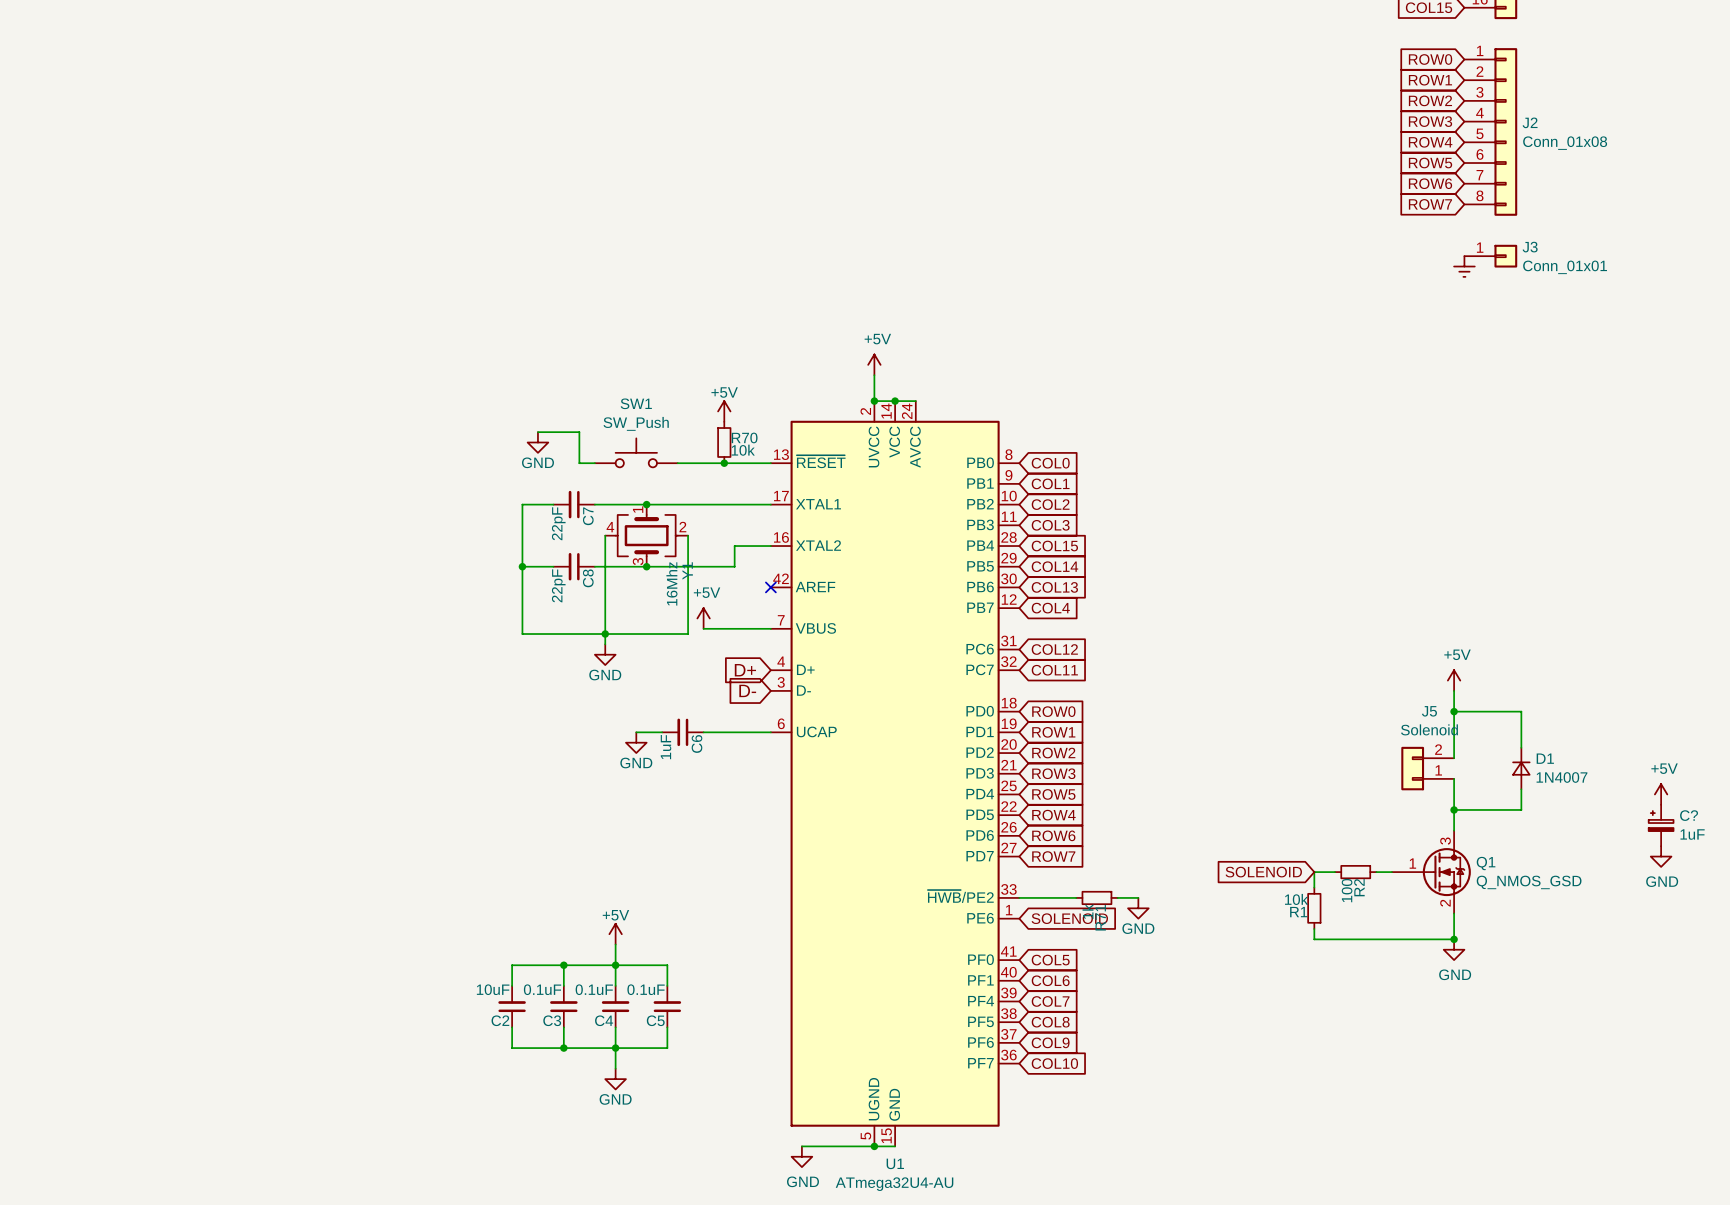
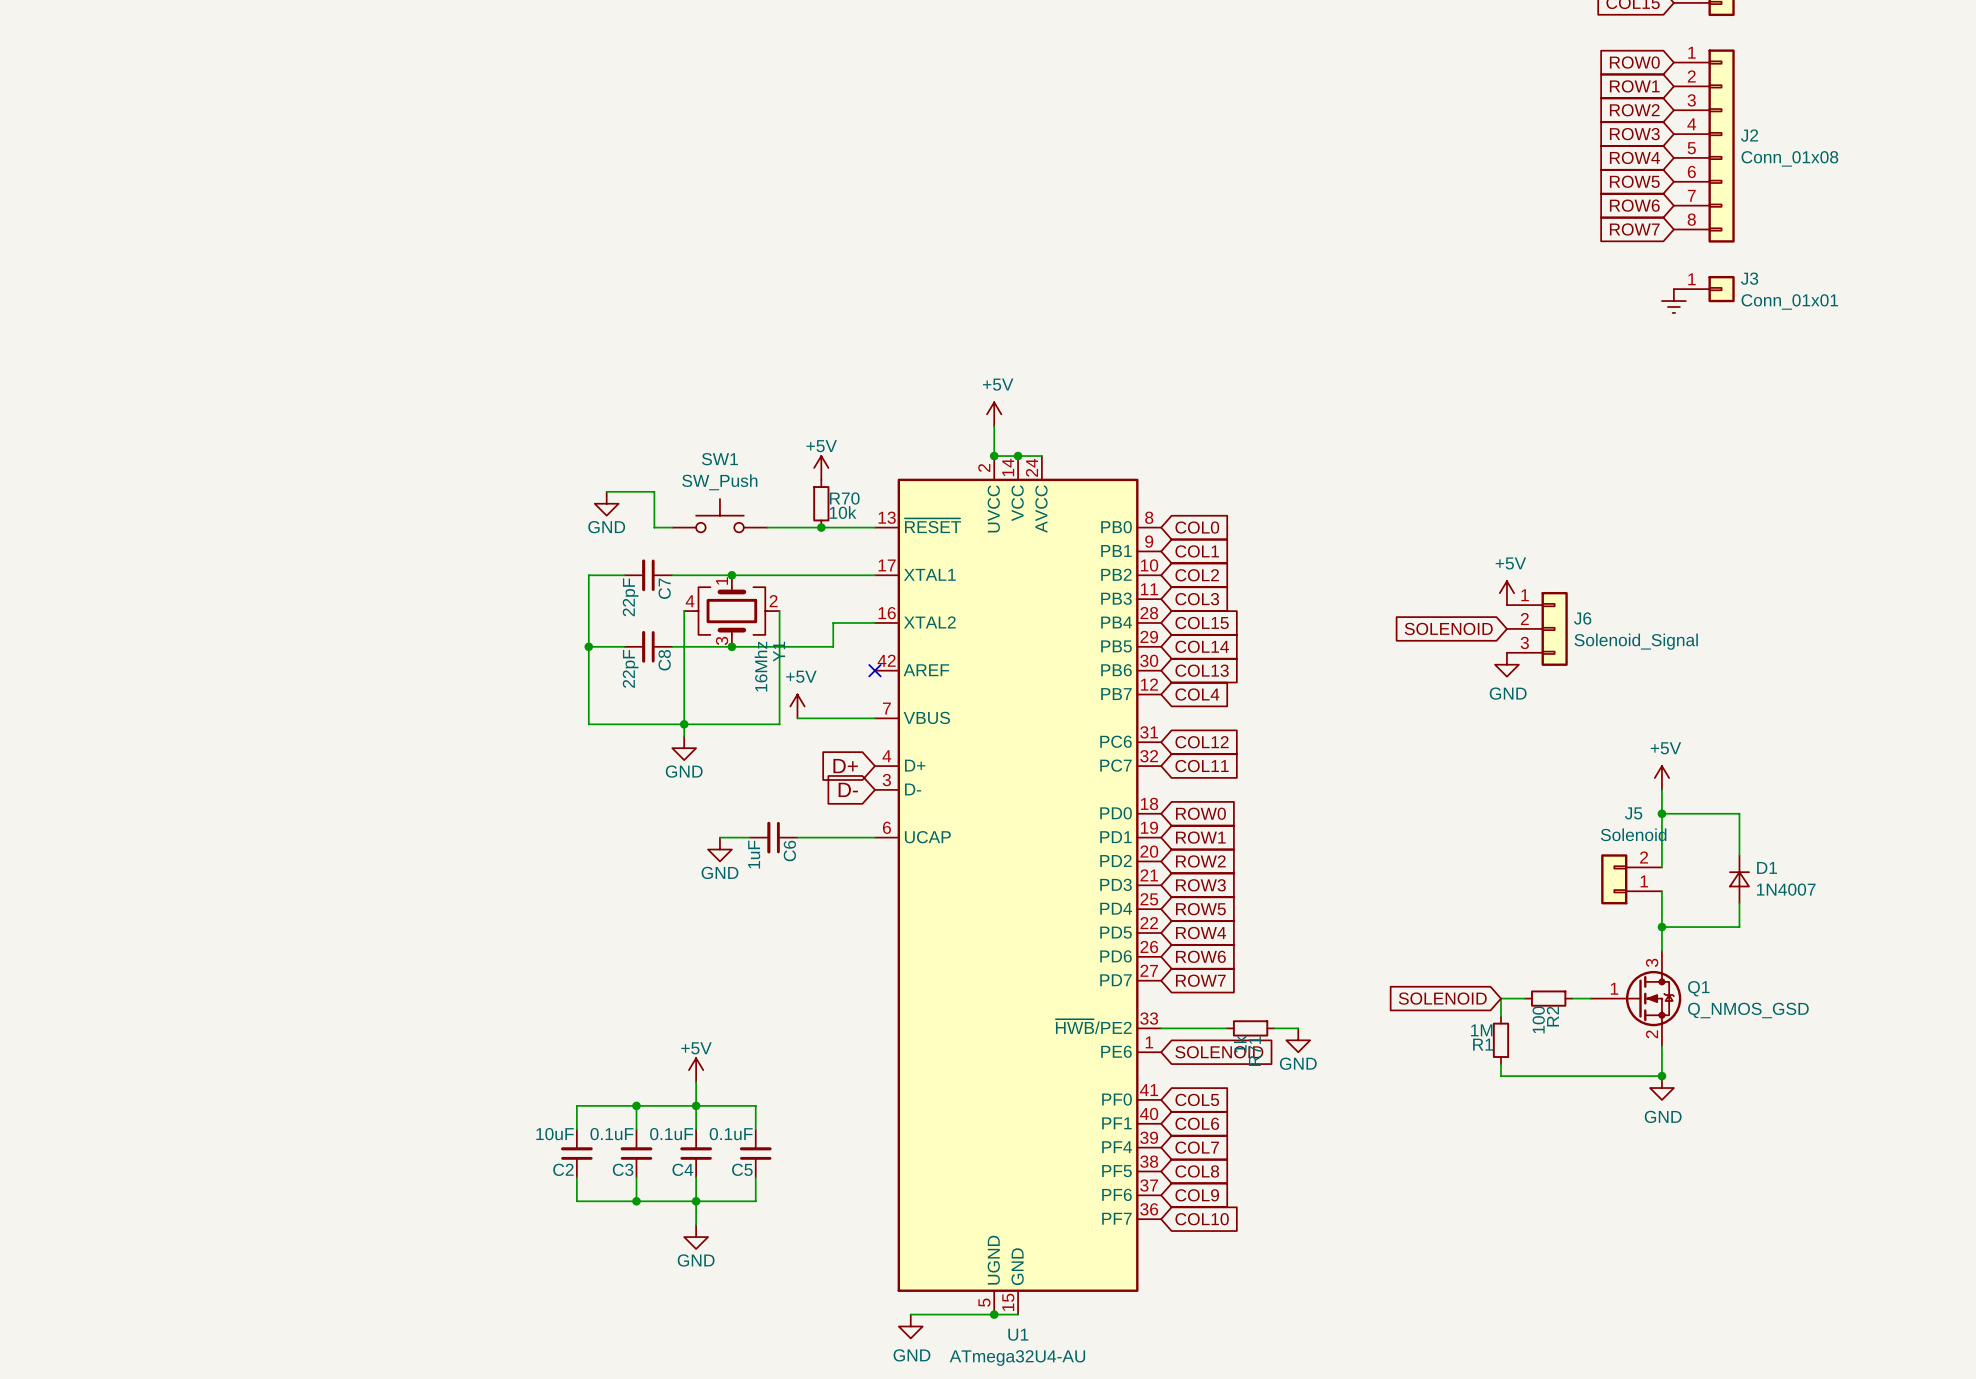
power symbol: none -> +5V (1506, 593)
global label: none -> SOLENOID (1448, 628)
J6: none -> Solenoid_Signal (1537, 628)
power symbol: none -> GND (1506, 664)
power symbol: +5V (1661, 794) -> none
C?: 1uF (1661, 825) -> none
power symbol: GND (1661, 856) -> none
R1 value: 10k (1296, 899) -> 1M (1481, 1030)

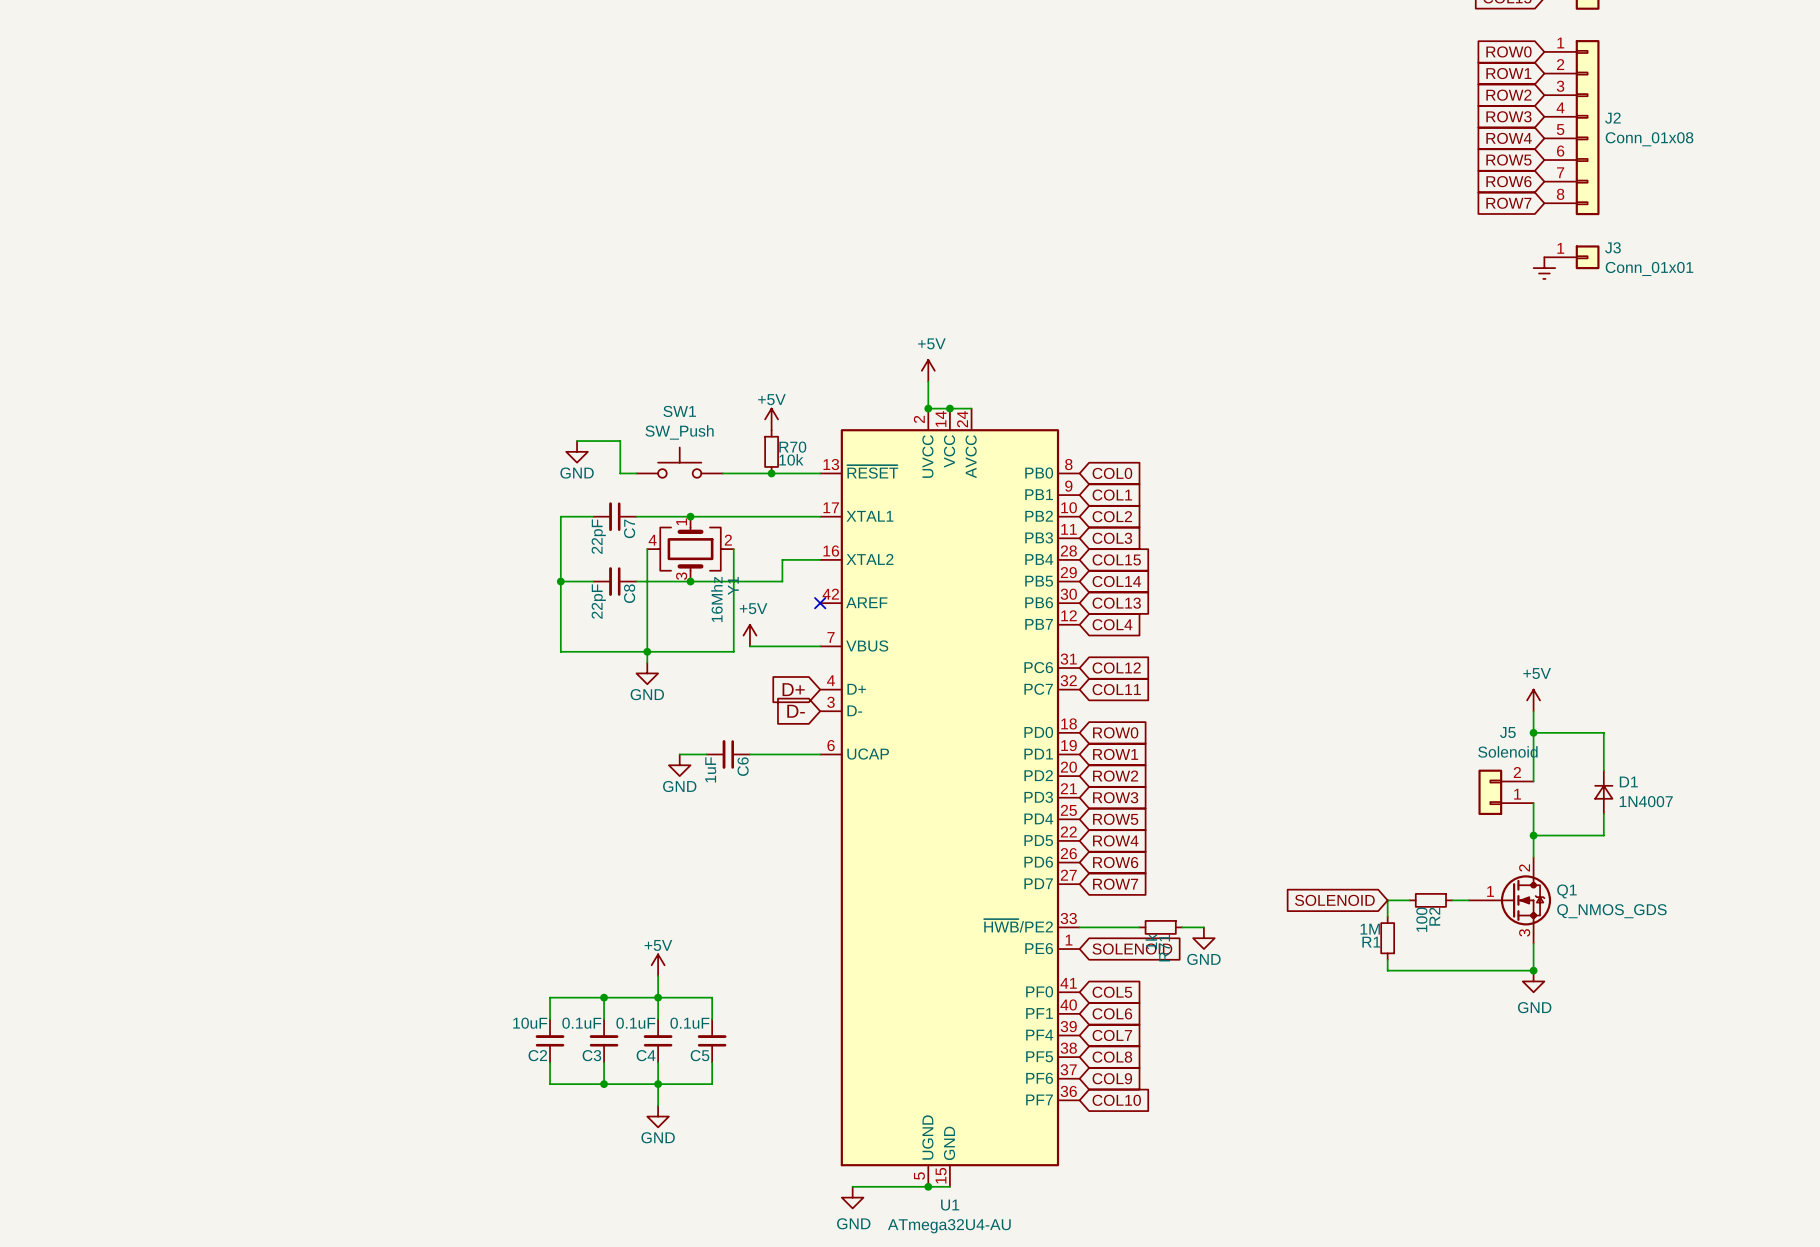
power symbol: +5V (1506, 593) -> none
global label: SOLENOID (1448, 628) -> none
J6: Solenoid_Signal (1537, 628) -> none
power symbol: GND (1506, 664) -> none
Q1 pin number: 3 (1652, 962) -> 2 (1524, 867)
Q1 value: Q_NMOS_GSD (1748, 1010) -> Q_NMOS_GDS (1611, 911)
Q1 pin number: 2 (1652, 1034) -> 3 (1524, 932)

